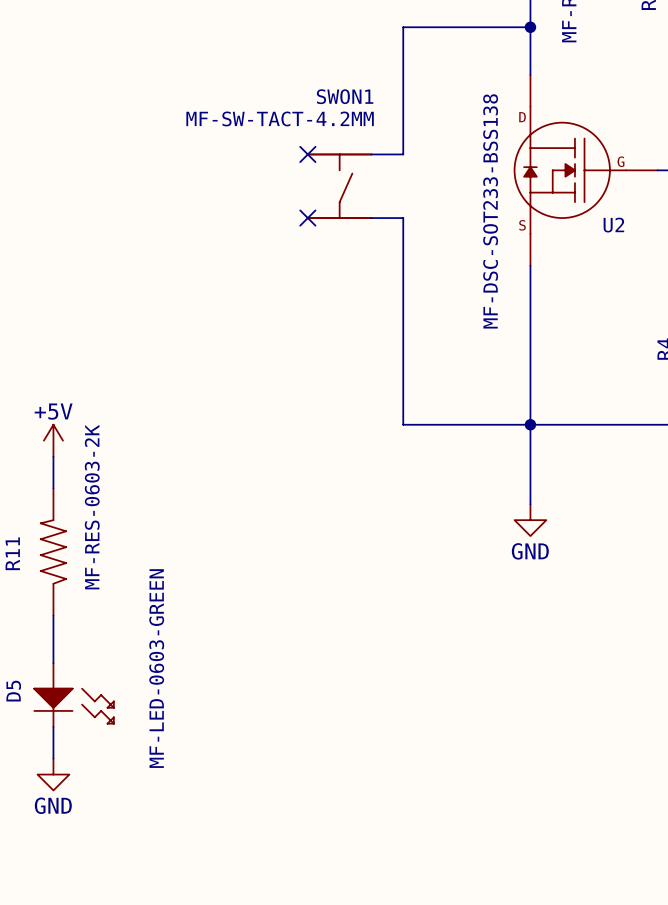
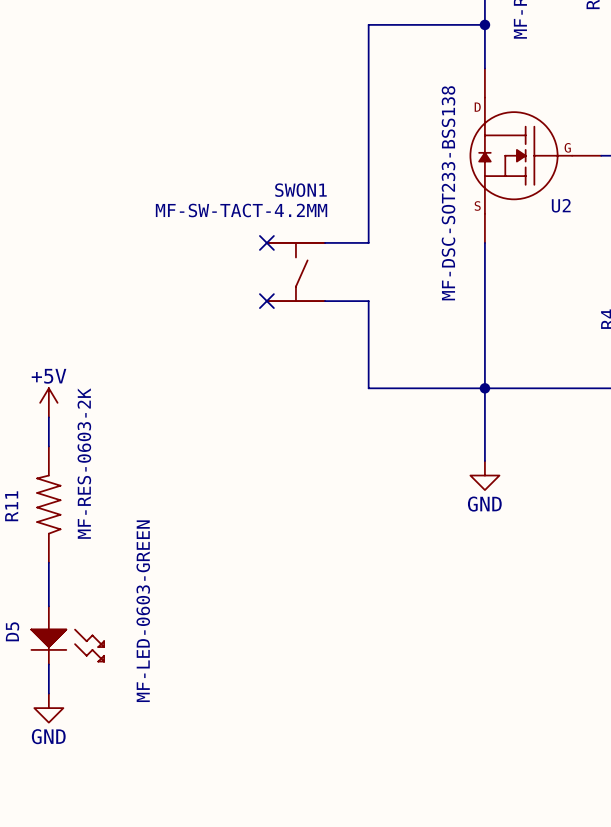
no-connect mark: (307, 154) -> none
wire: (371, 154) (403, 154) -> (368, 199) (368, 141)
SWON1 position: (339, 186) -> (295, 272)
no-connect mark position: (307, 218) -> (266, 242)
wire: (371, 218) (403, 218) -> none
wire: (403, 265) (403, 329) -> (368, 242) (325, 242)
no-connect mark: none -> (266, 301)
wire: none -> (325, 301) (368, 301)

